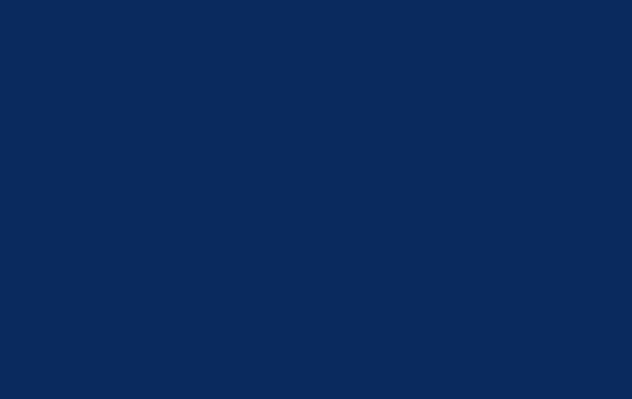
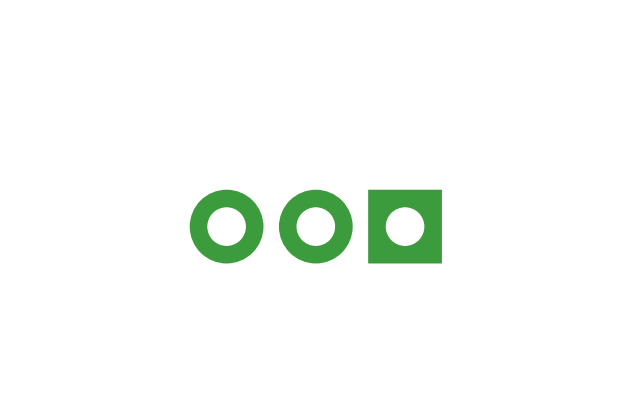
part: none -> (315, 226)

